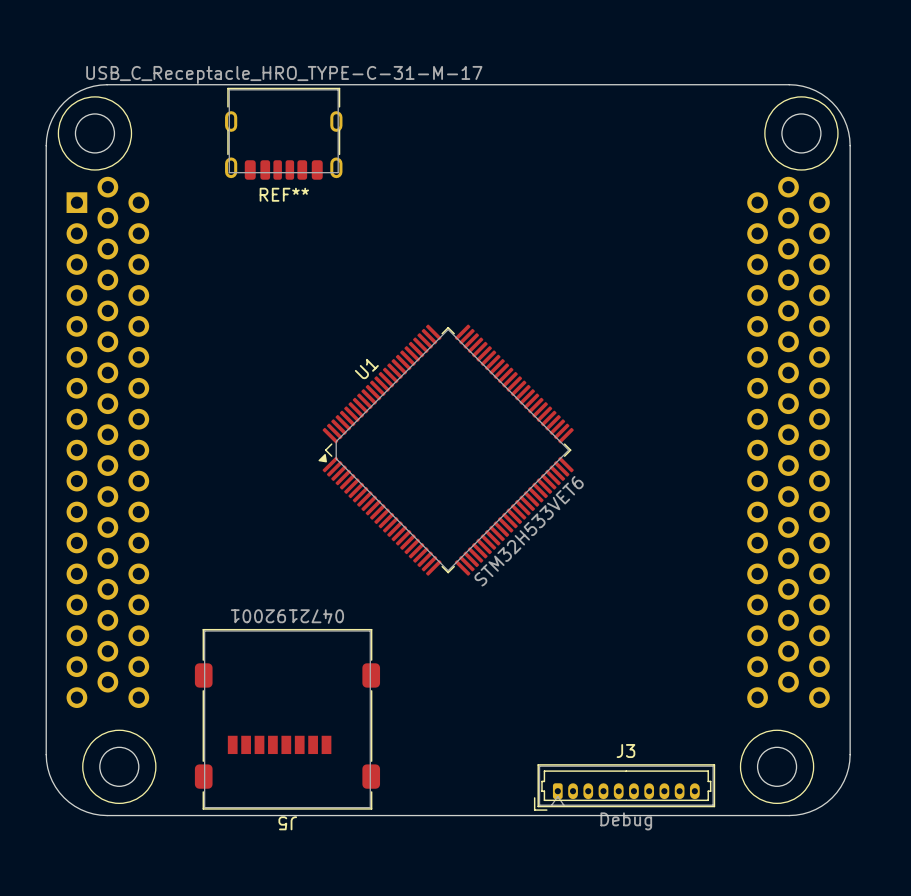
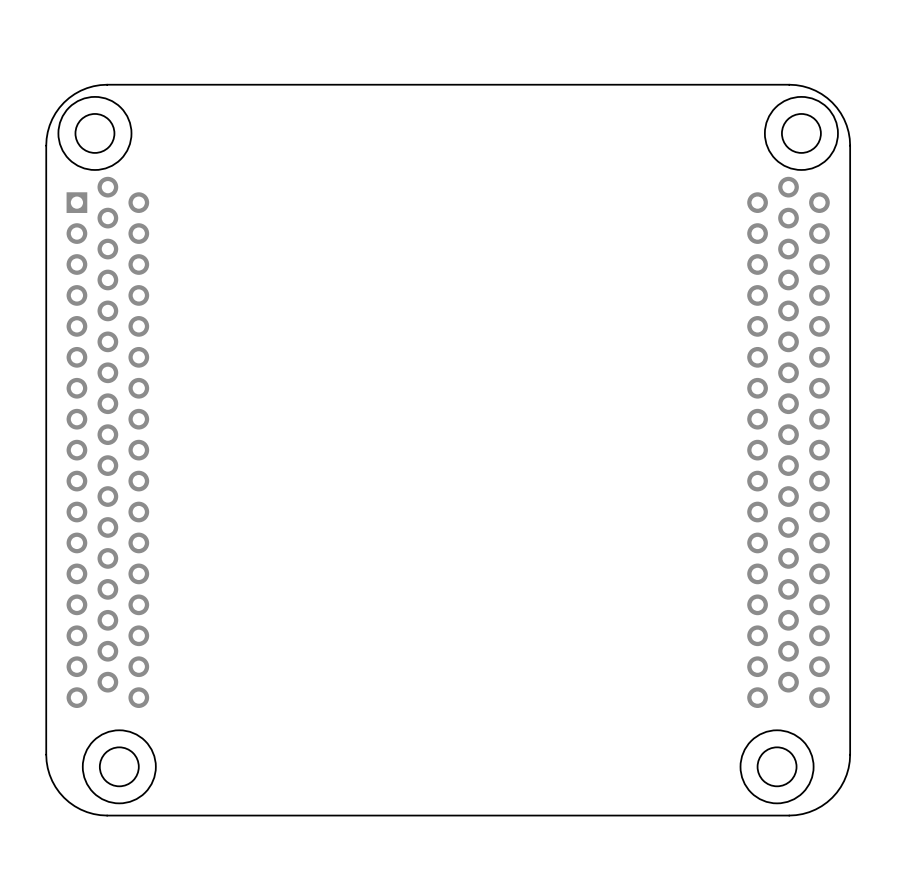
REF**: USB_C_Receptacle_HRO_TYPE-C-31-M-17 (283, 133) -> none
U1: STM32H533VET6 (446, 450) -> none
J5: 0472192001 (287, 719) -> none
J3: Debug (624, 787) -> none

